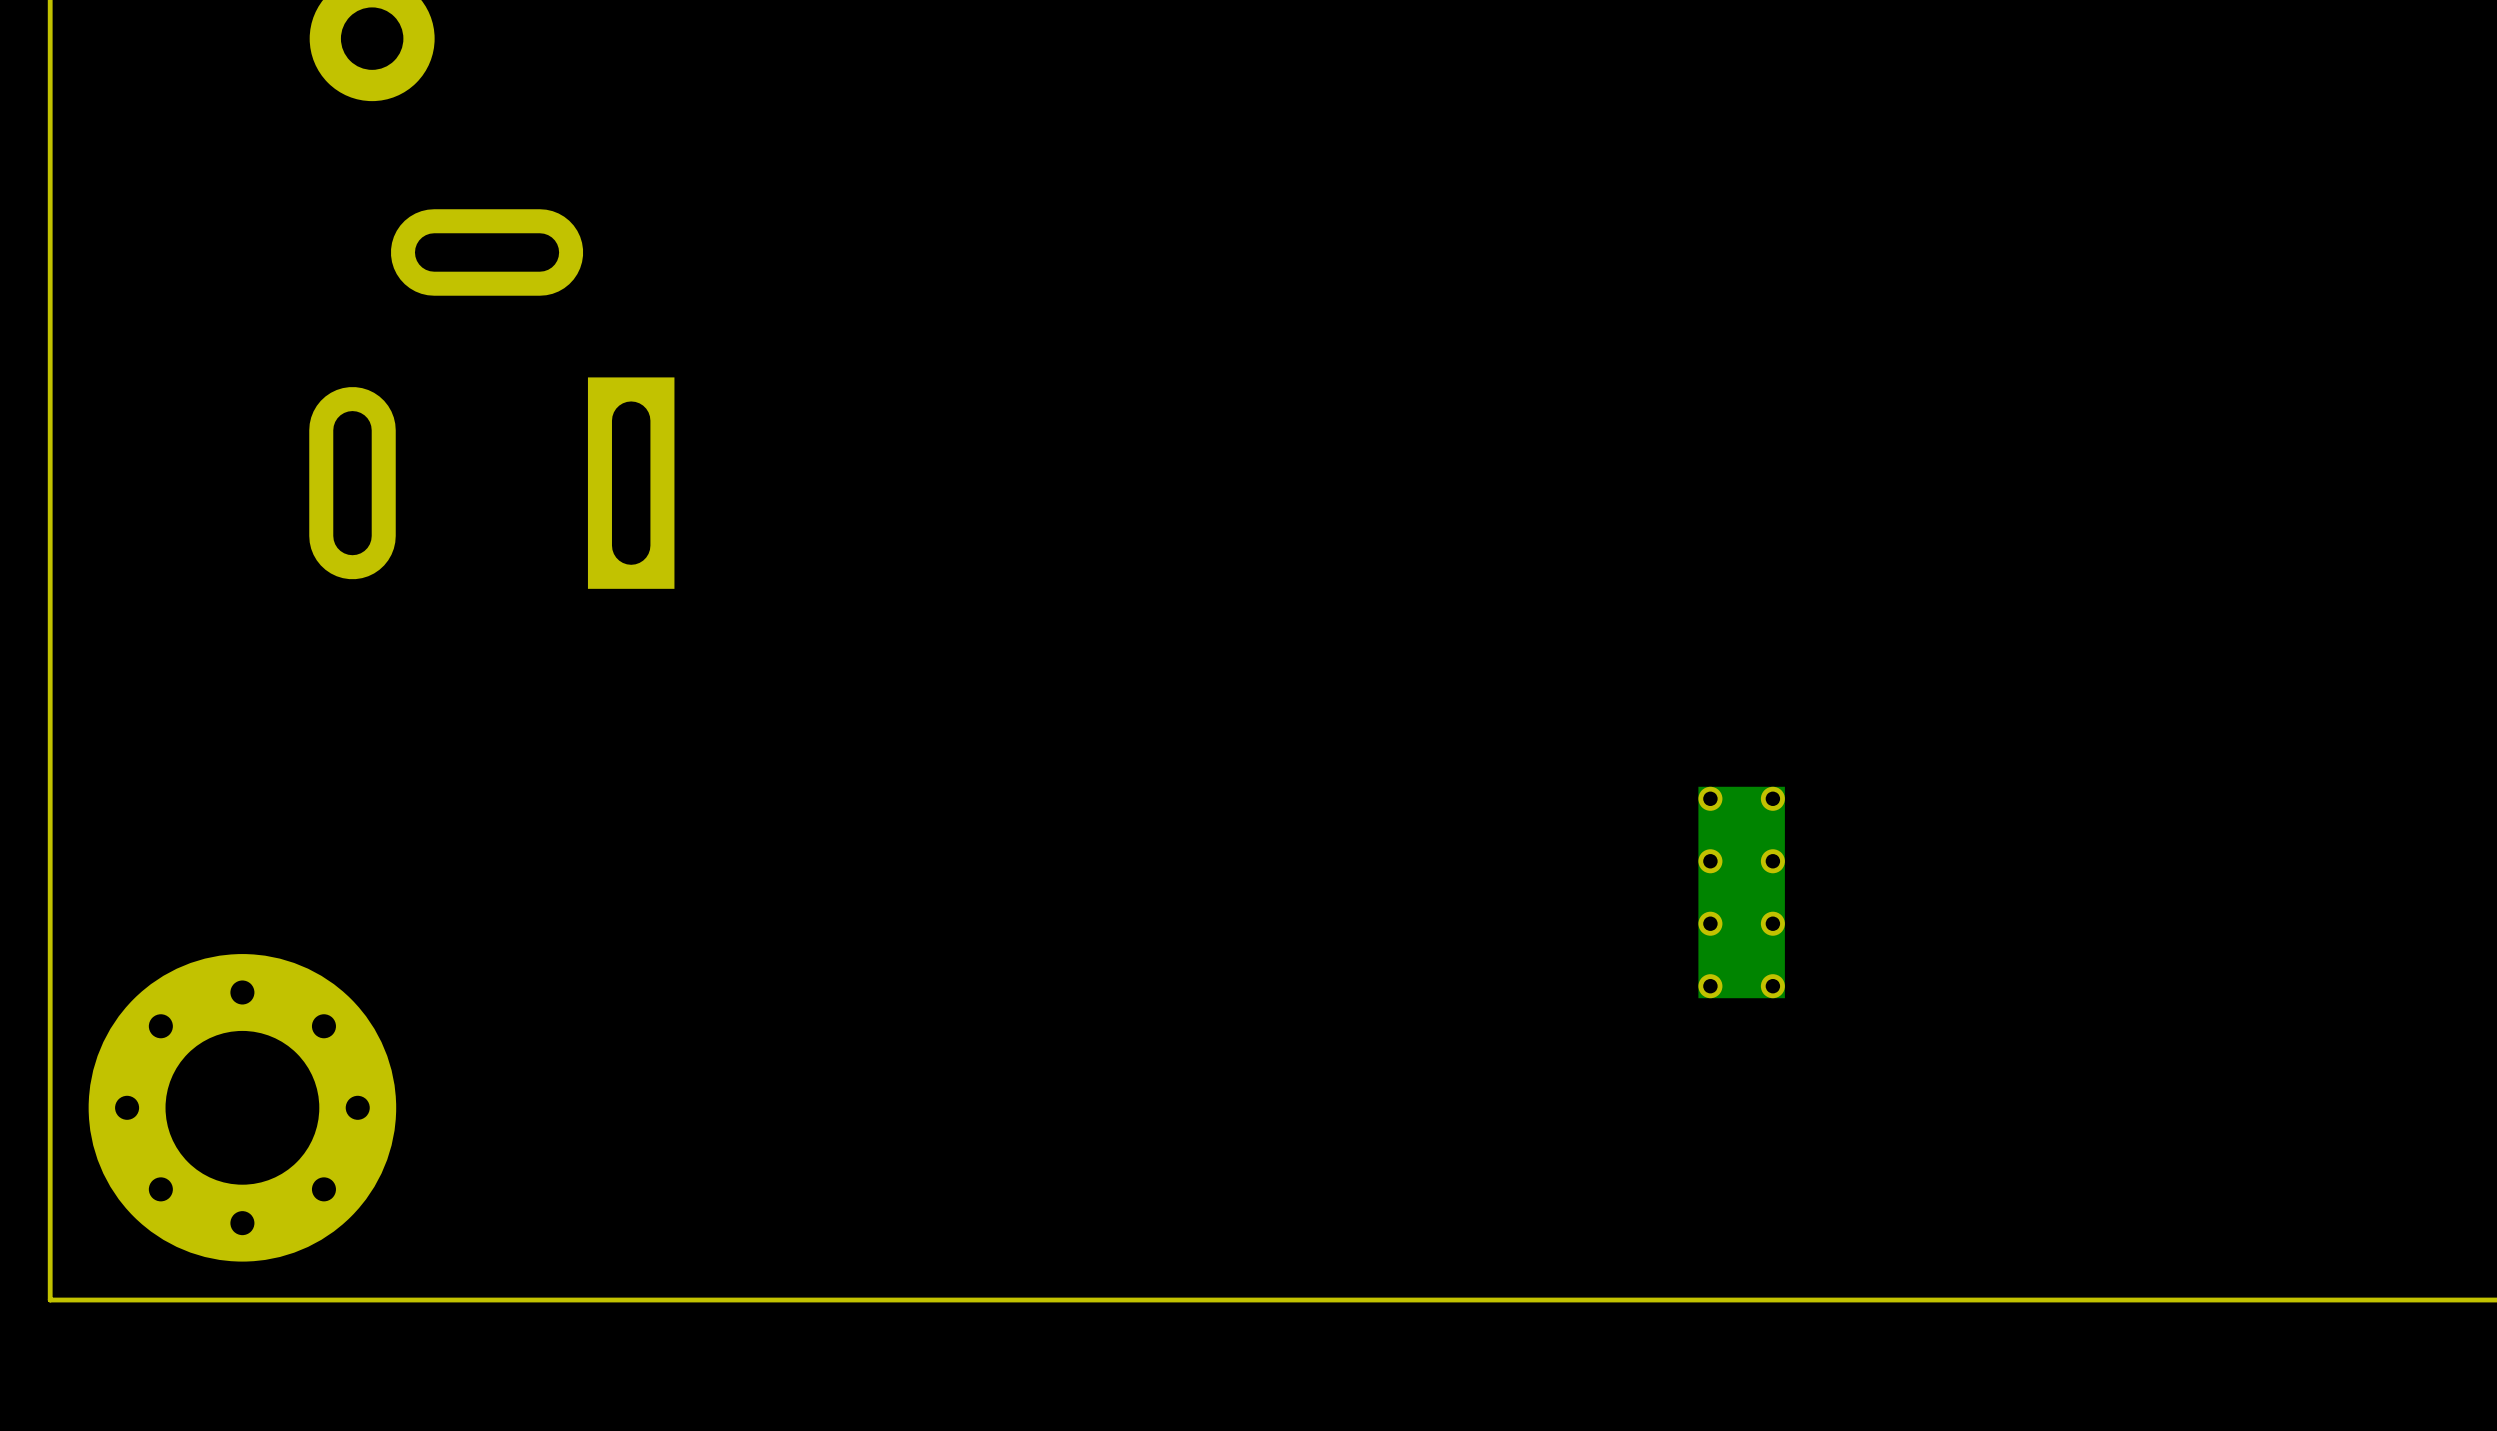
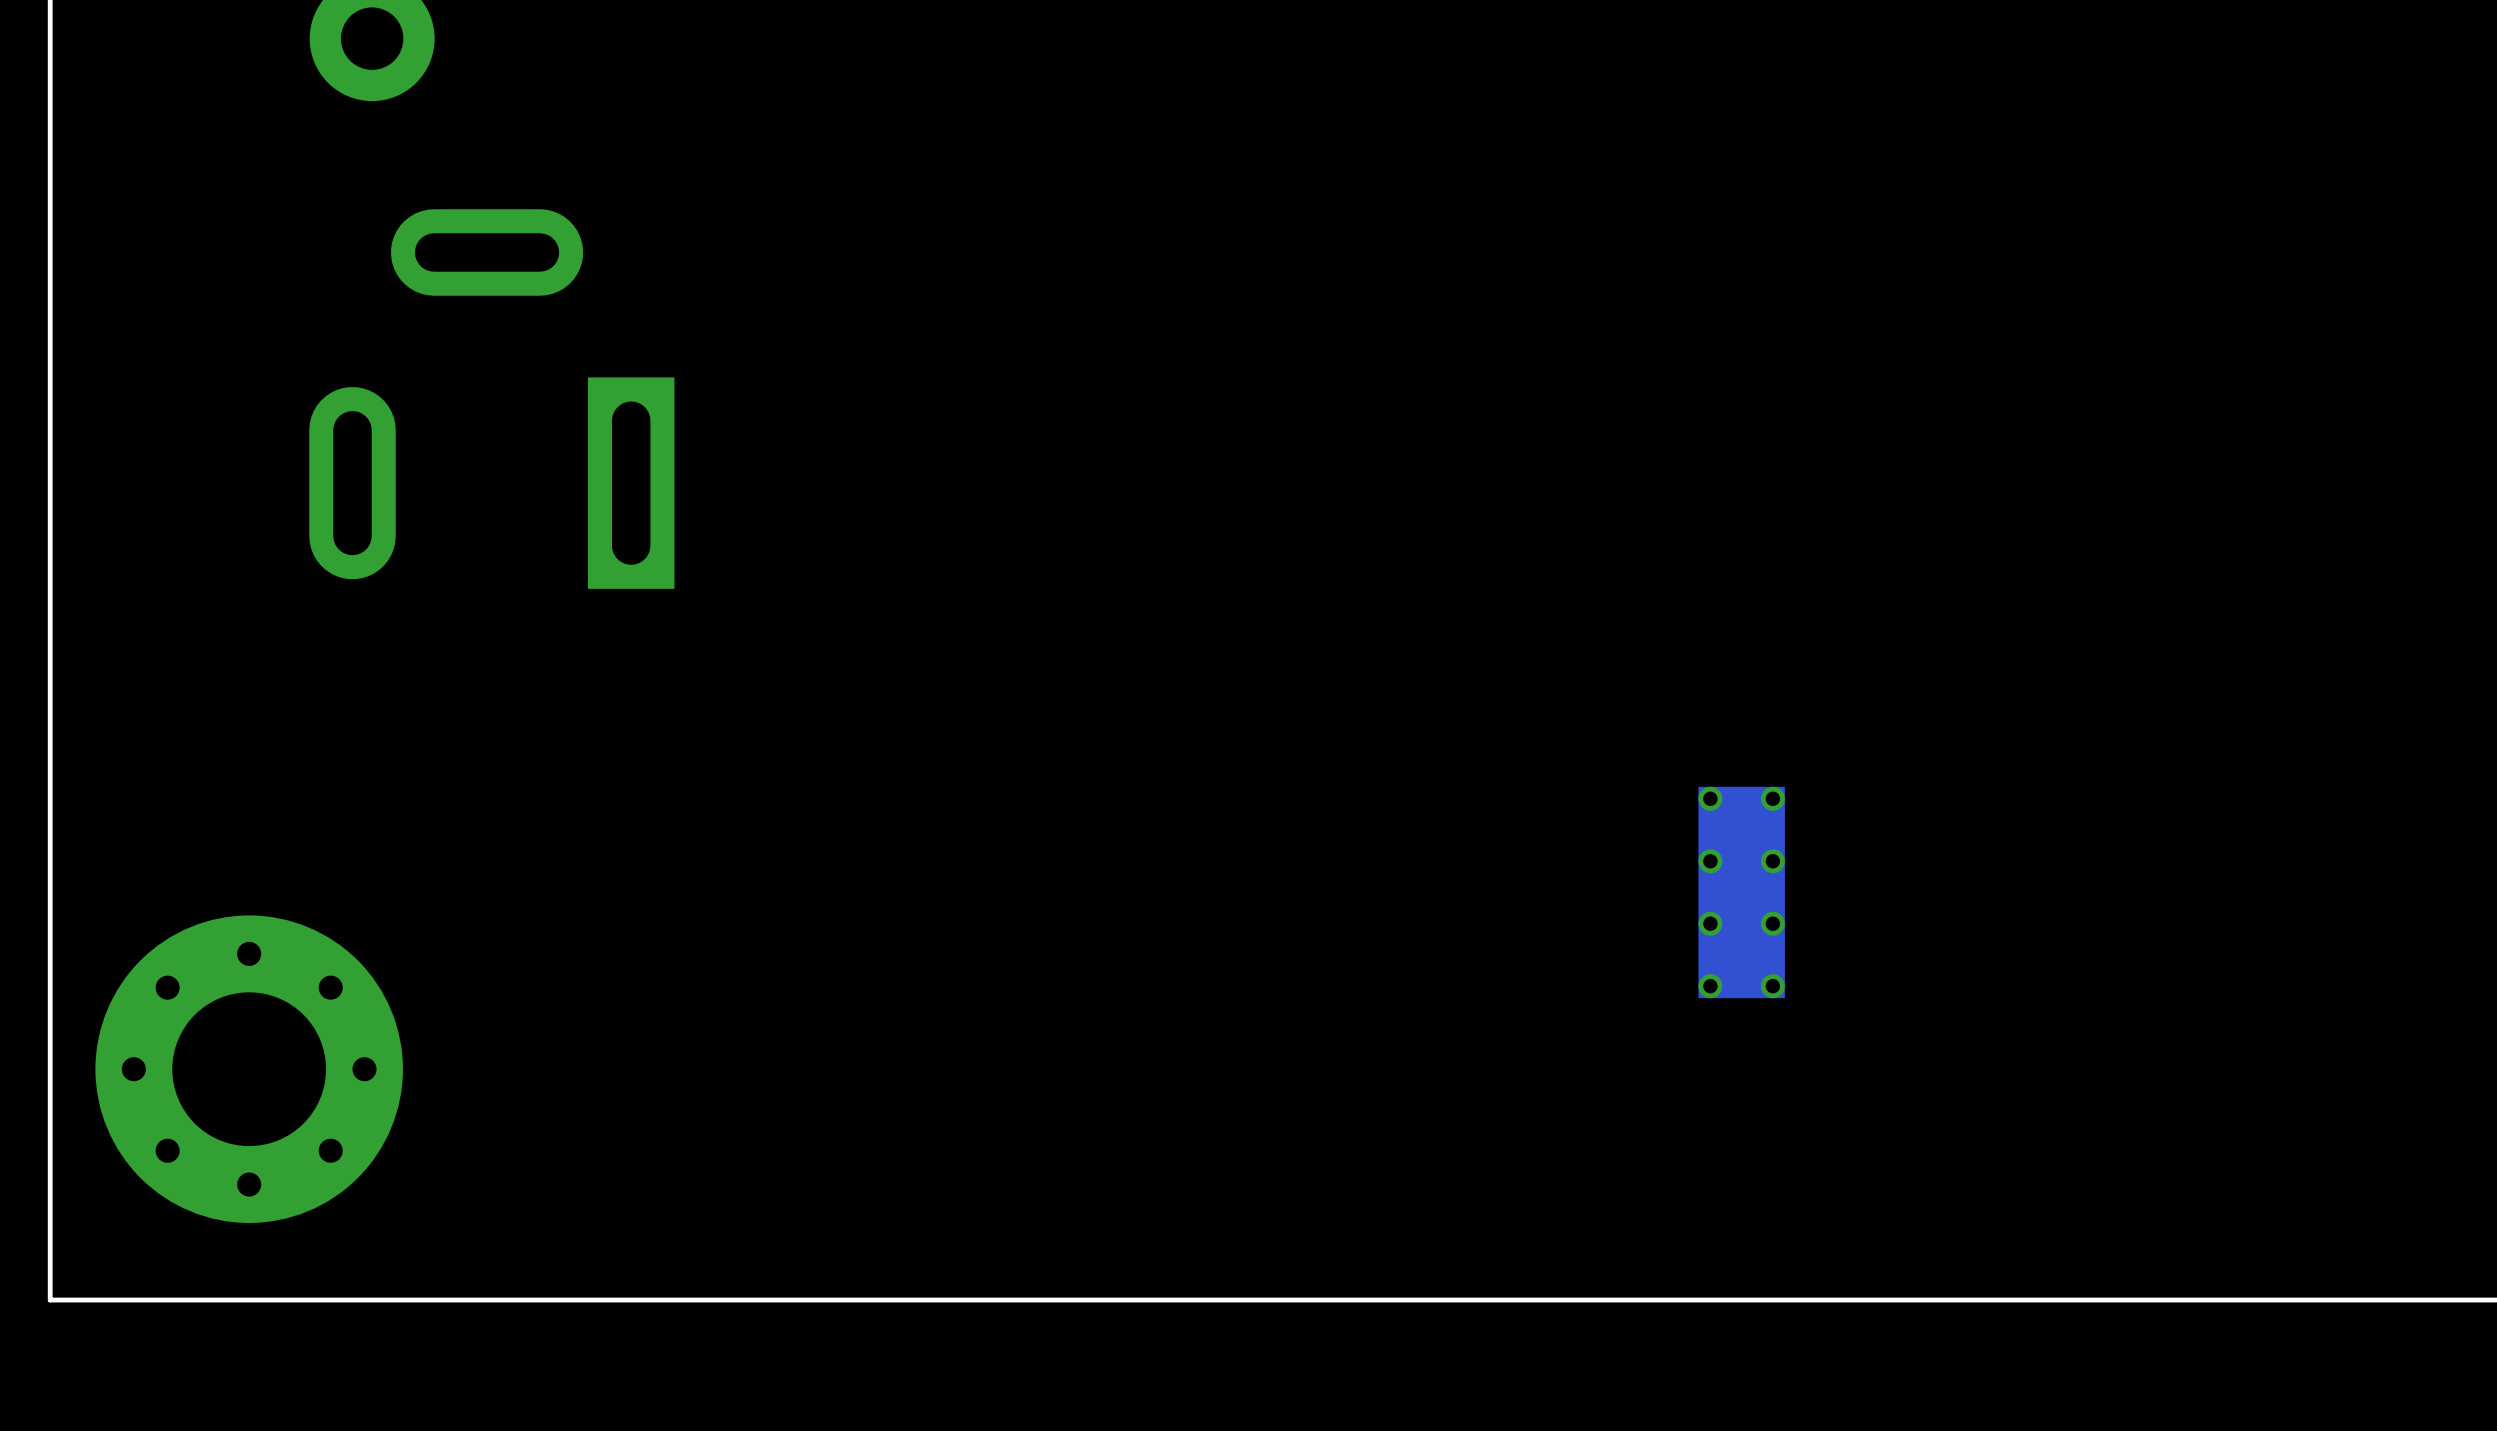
part position: (242, 1107) -> (249, 1069)

